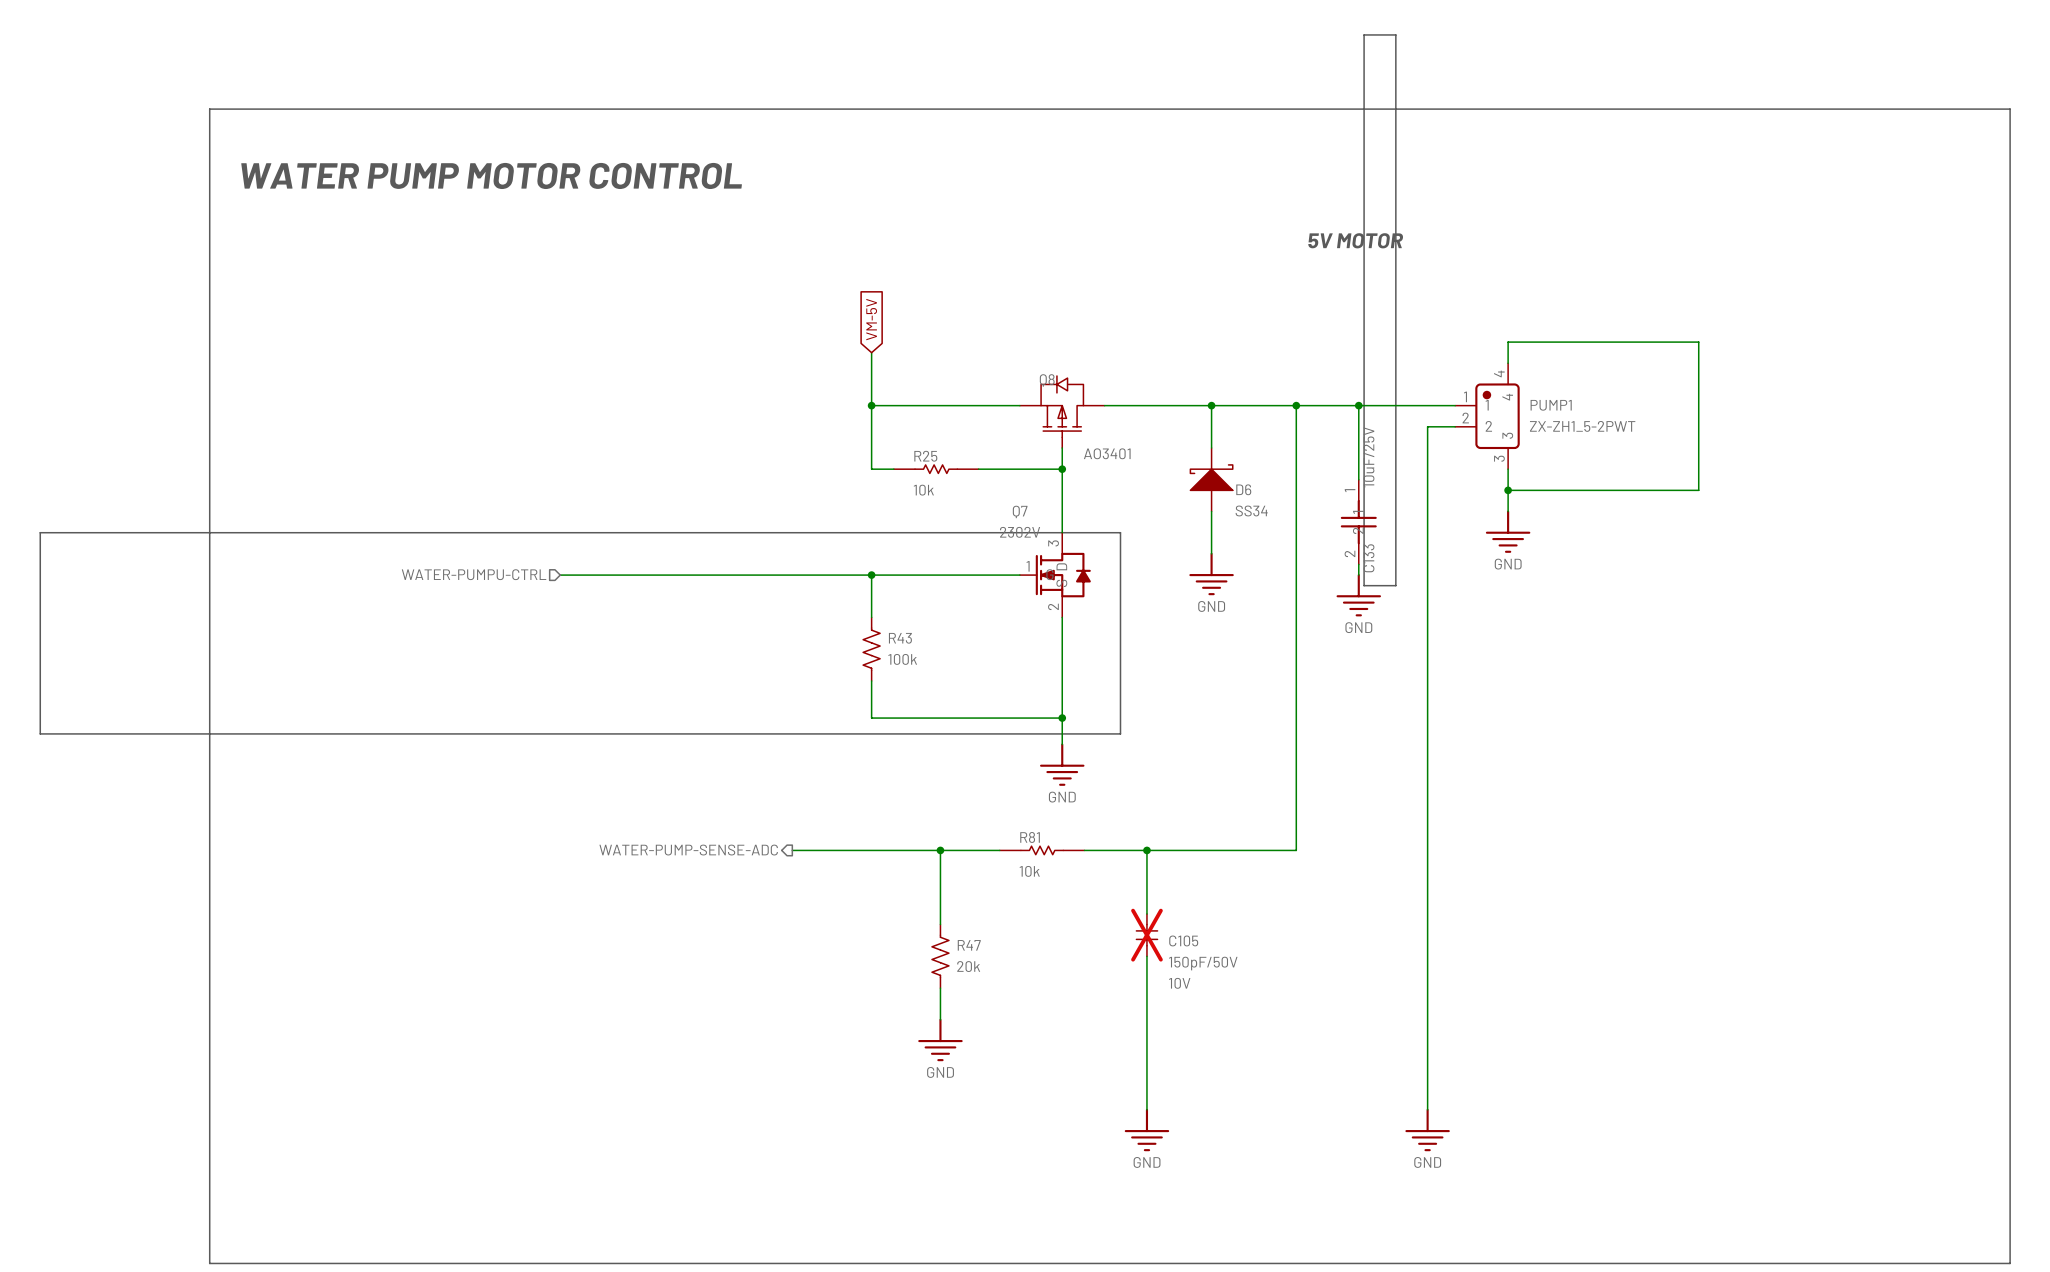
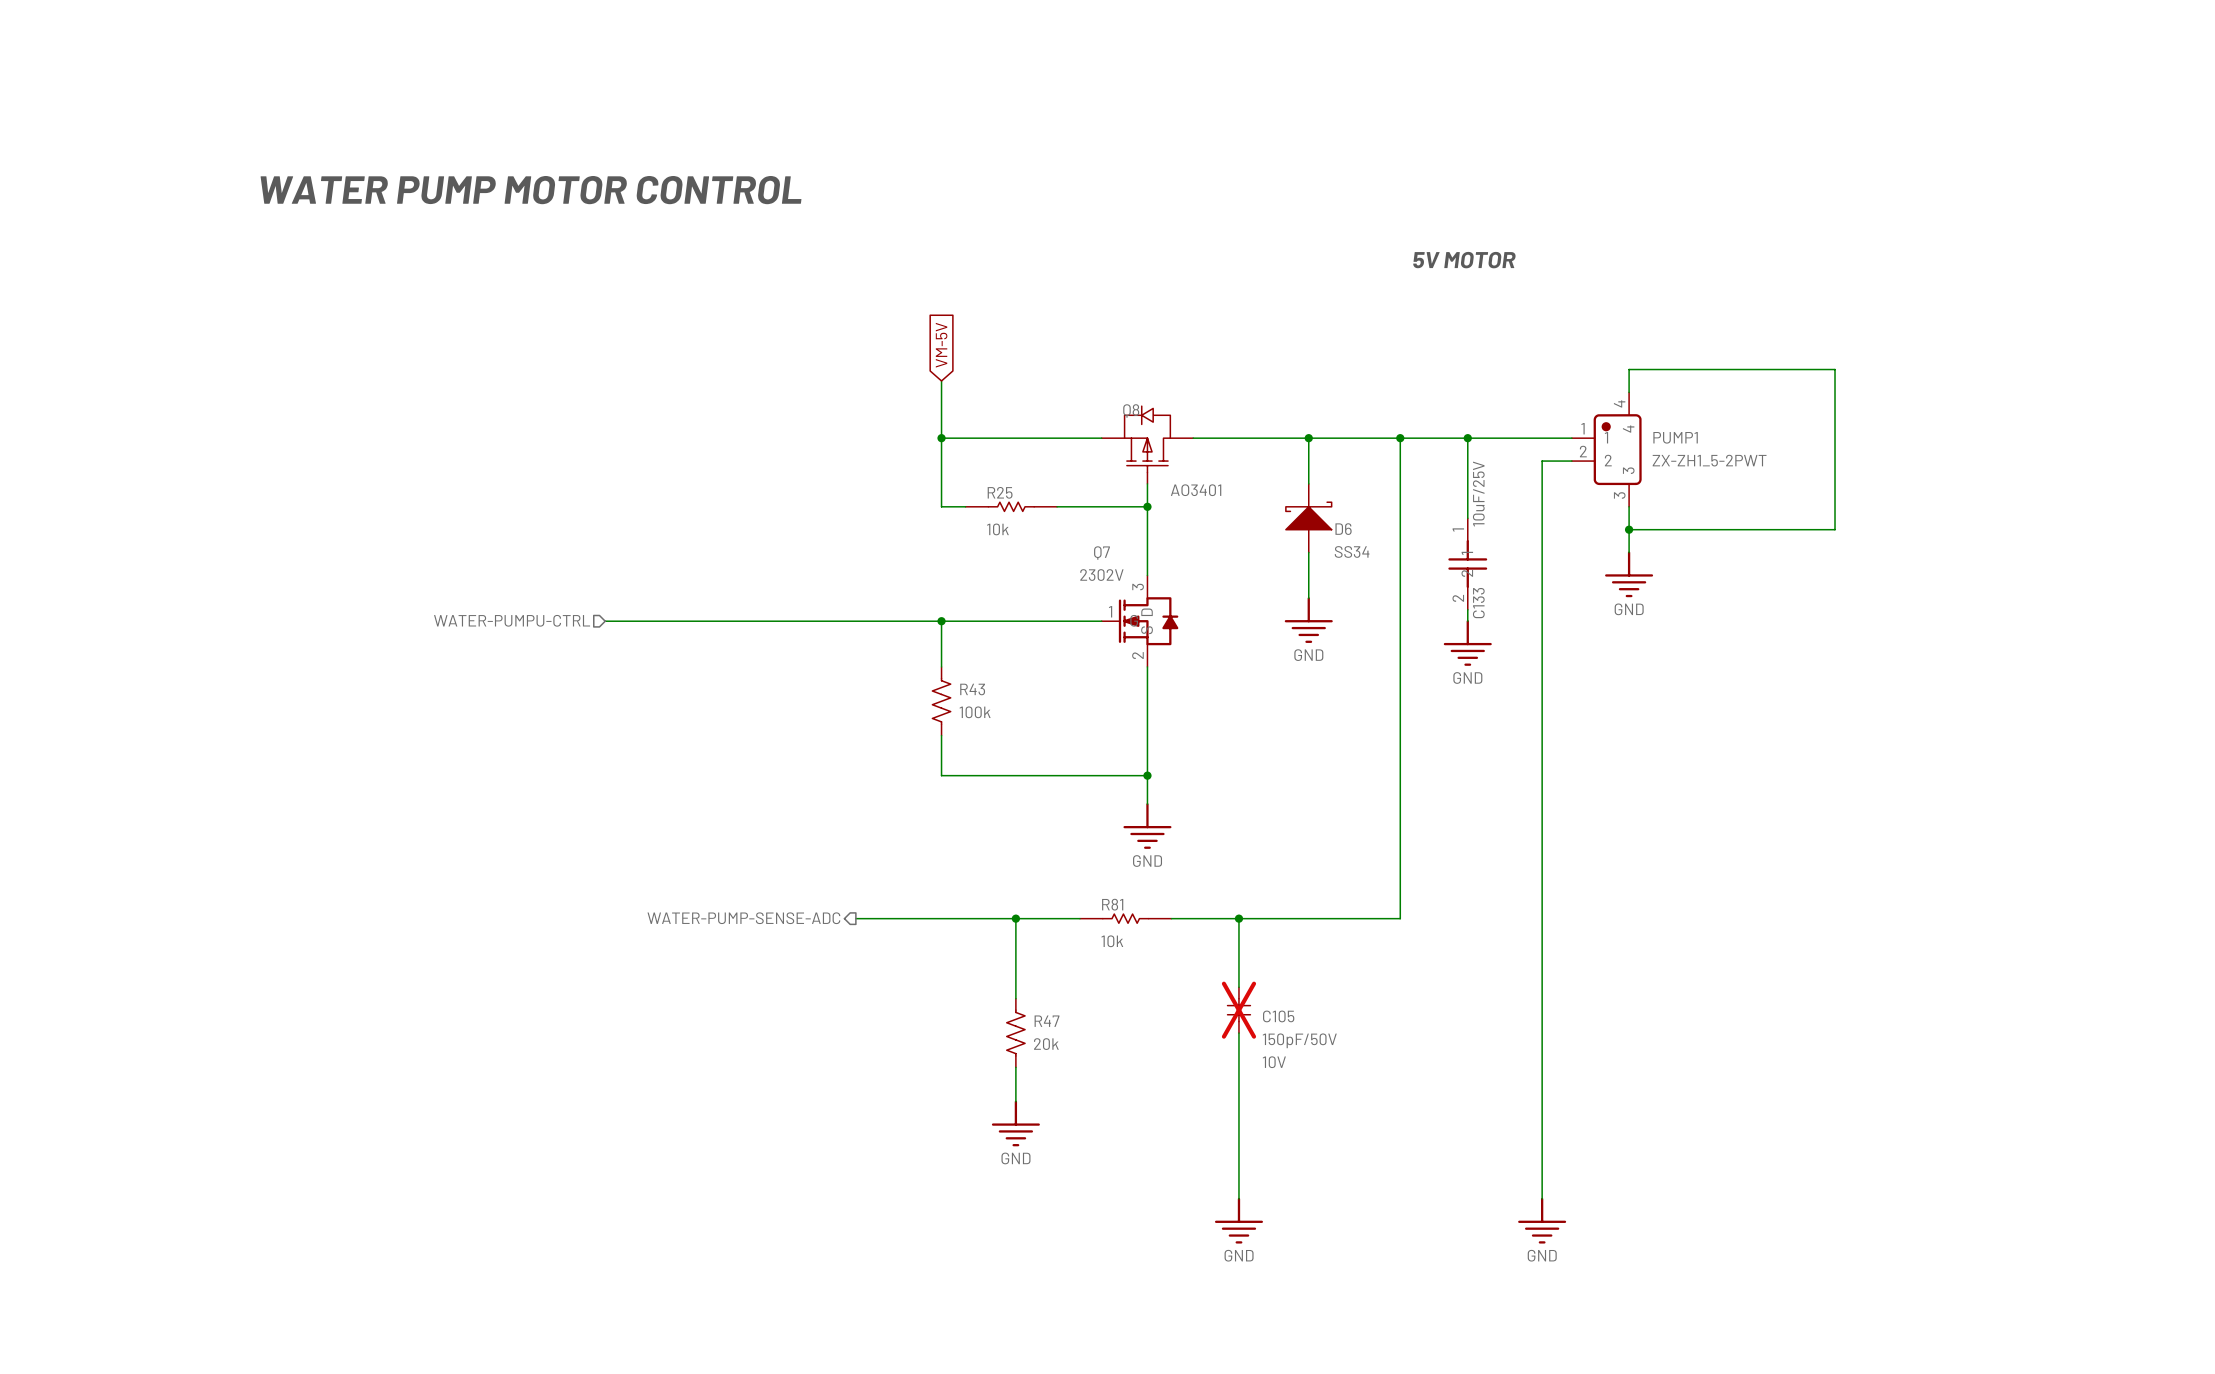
line: (1364, 34) (1395, 34) (1395, 585) (1364, 585) (1364, 34) -> none
line: (209, 109) (2010, 109) (2010, 1263) (209, 1263) (209, 109) -> none
line: (40, 532) (1120, 532) (1120, 733) (40, 733) (40, 532) -> none

